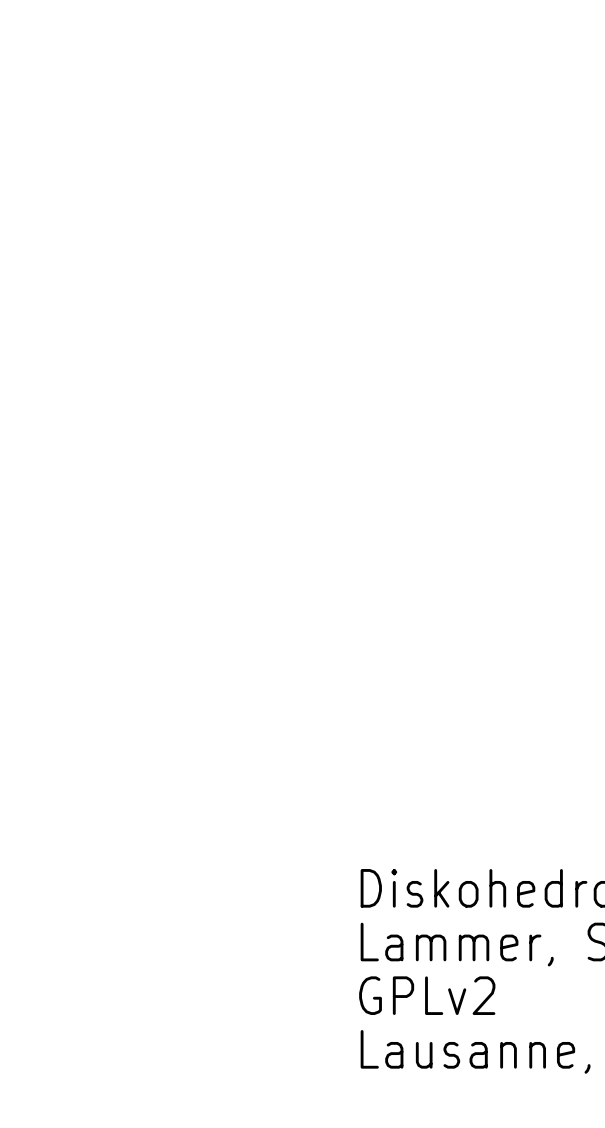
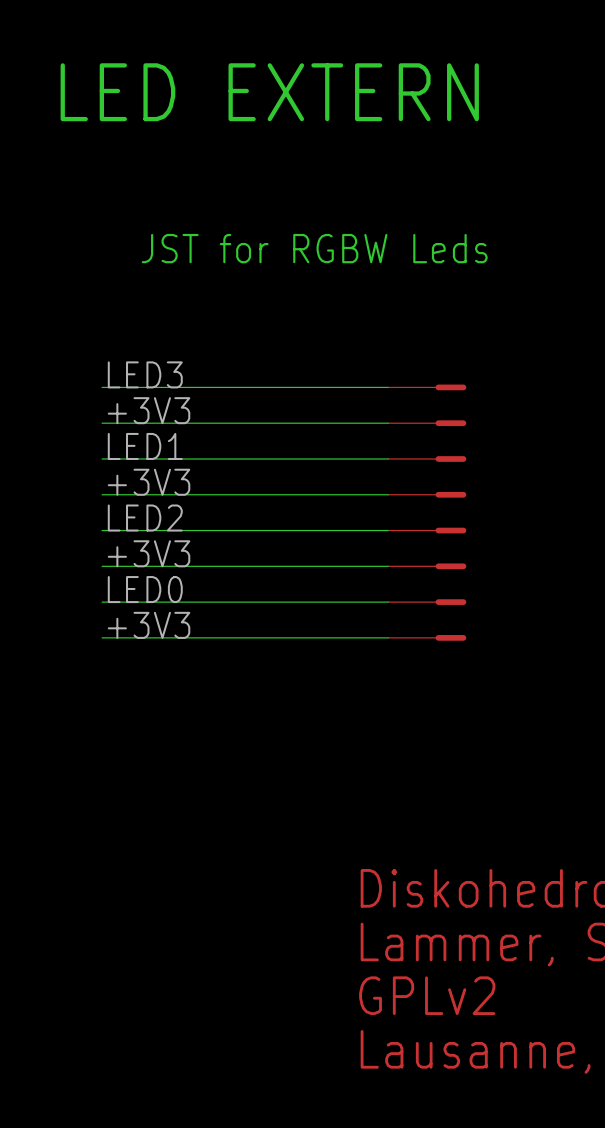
text: none -> LED EXTERN (269, 92)
text: none -> JST for RGBW Leds (314, 248)
label: none -> LED3 (145, 374)
wire: none -> (102, 387) (388, 387)
part: none -> (427, 387)
label: none -> +3V3 (149, 410)
wire: none -> (102, 423) (388, 423)
part: none -> (427, 423)
label: none -> LED1 (145, 446)
wire: none -> (102, 458) (388, 458)
part: none -> (427, 458)
label: none -> +3V3 (149, 482)
wire: none -> (102, 494) (388, 494)
part: none -> (427, 494)
label: none -> LED2 (145, 518)
wire: none -> (102, 530) (388, 530)
part: none -> (427, 530)
label: none -> +3V3 (149, 553)
wire: none -> (102, 566) (388, 566)
part: none -> (427, 566)
label: none -> LED0 (145, 589)
wire: none -> (102, 602) (388, 602)
part: none -> (427, 602)
label: none -> +3V3 (149, 625)
wire: none -> (102, 637) (388, 637)
part: none -> (427, 637)

